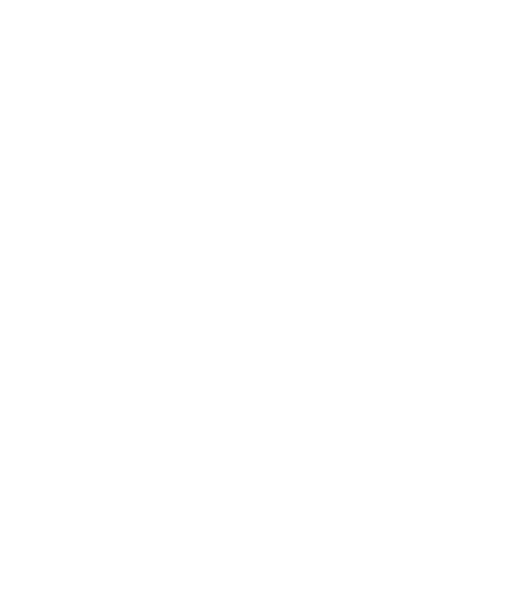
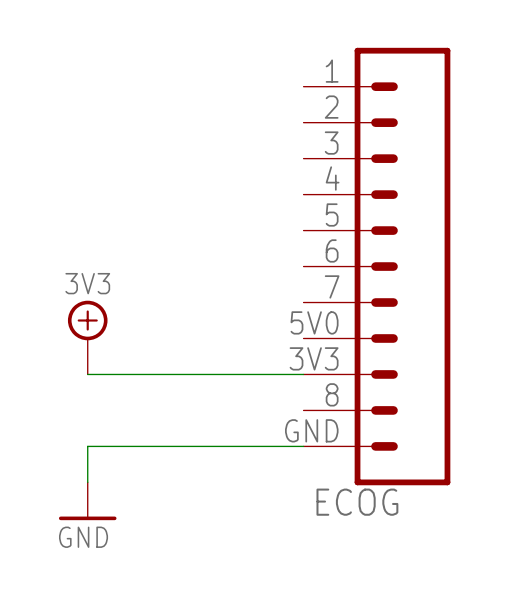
ECOG: none -> (376, 266)
power symbol: none -> 3V3 (87, 337)
wire: none -> (87, 374) (303, 374)
wire: none -> (303, 446) (87, 446) (87, 482)
power symbol: none -> GND (87, 501)

